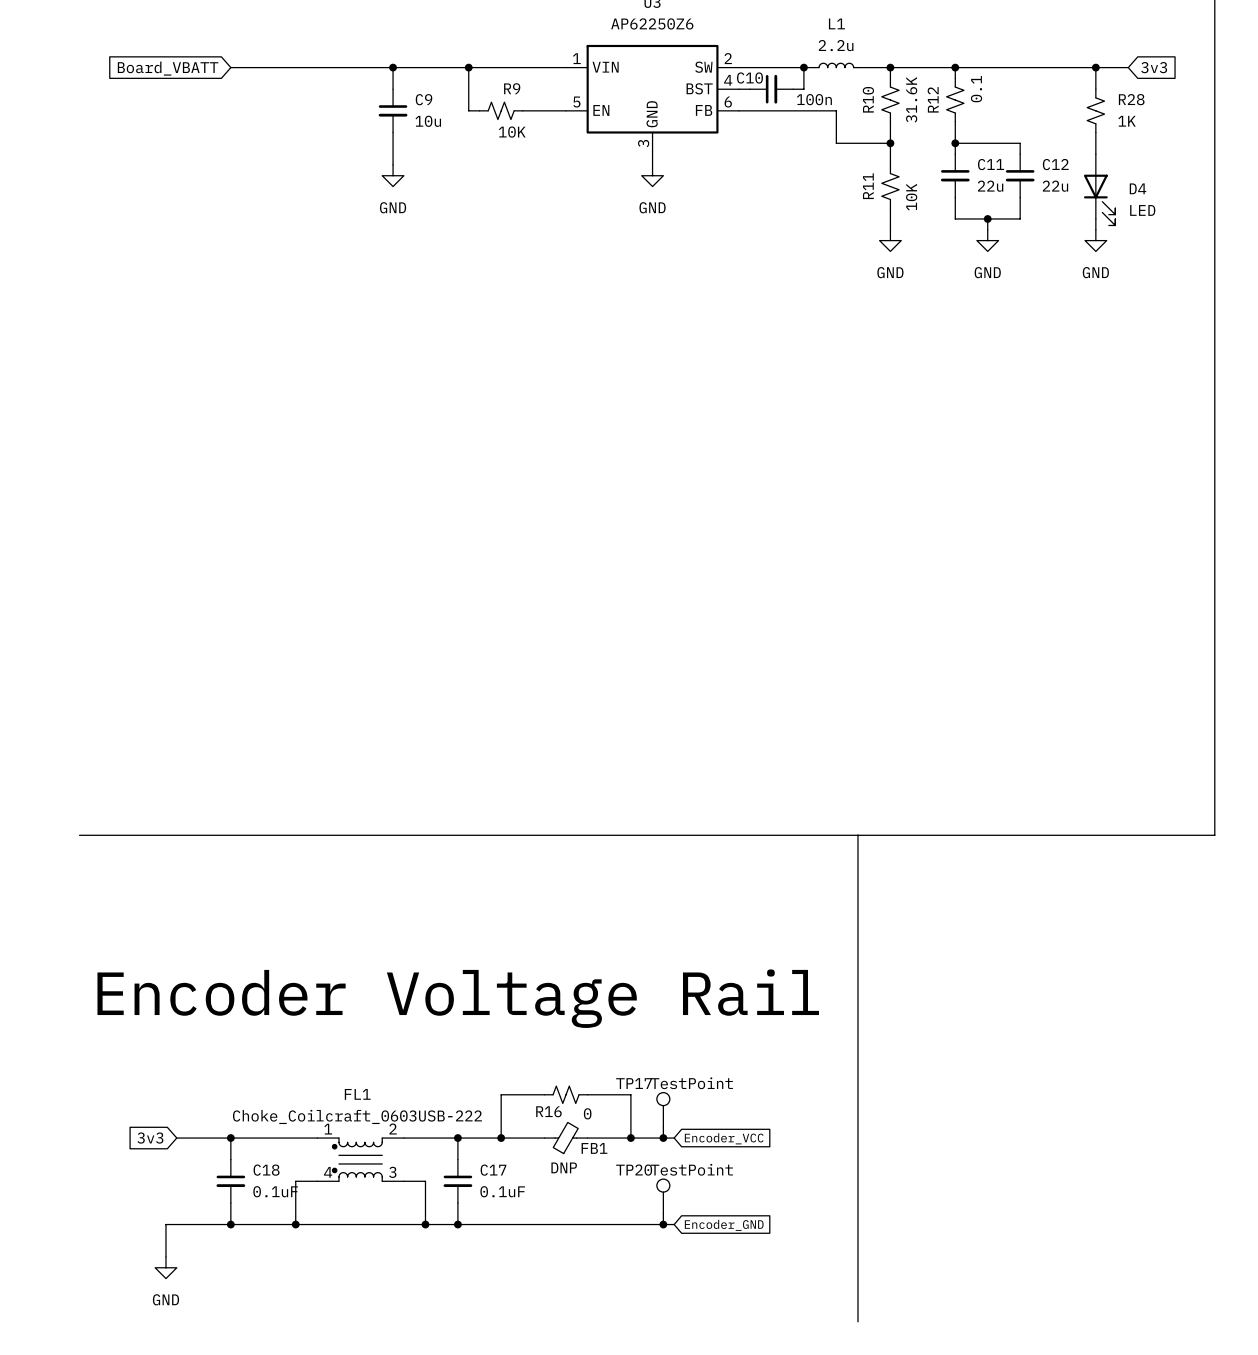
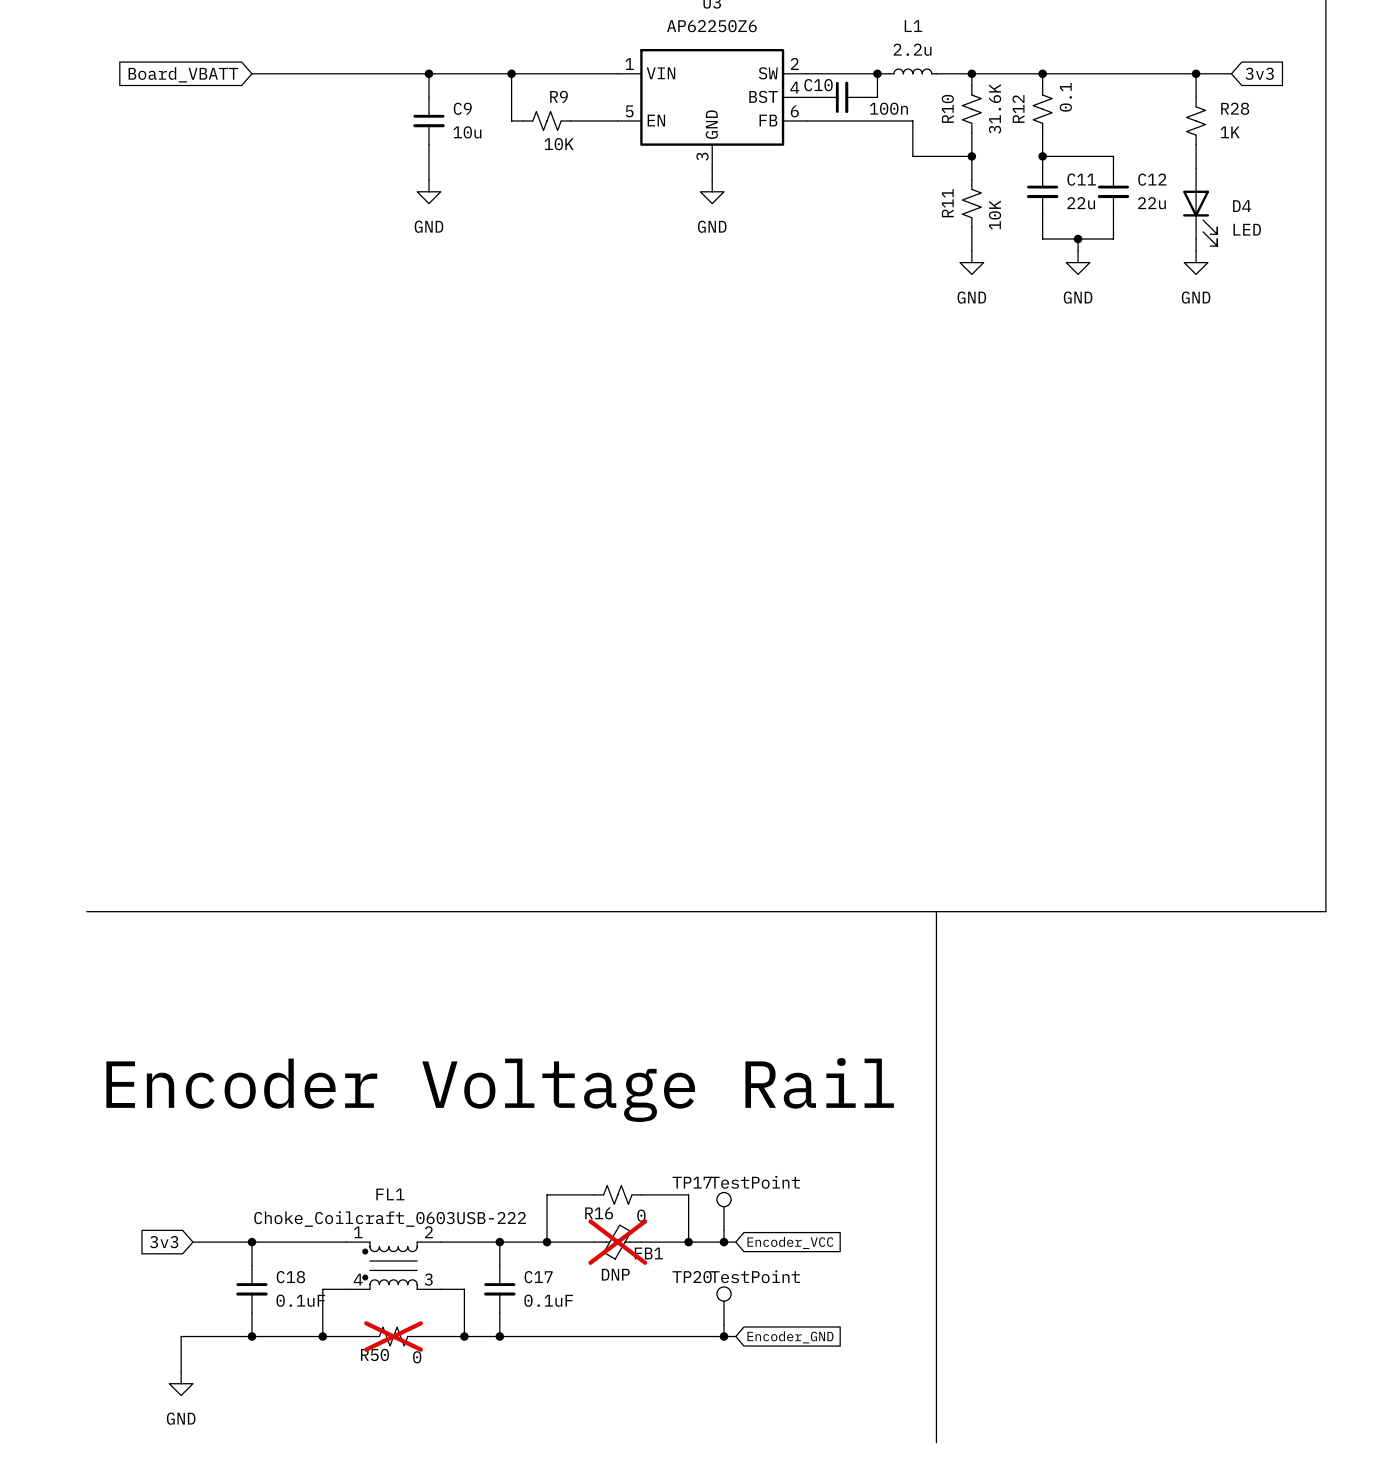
FB1 do-not-place cross: none -> (617, 1242)
R50: none -> 0 (393, 1336)

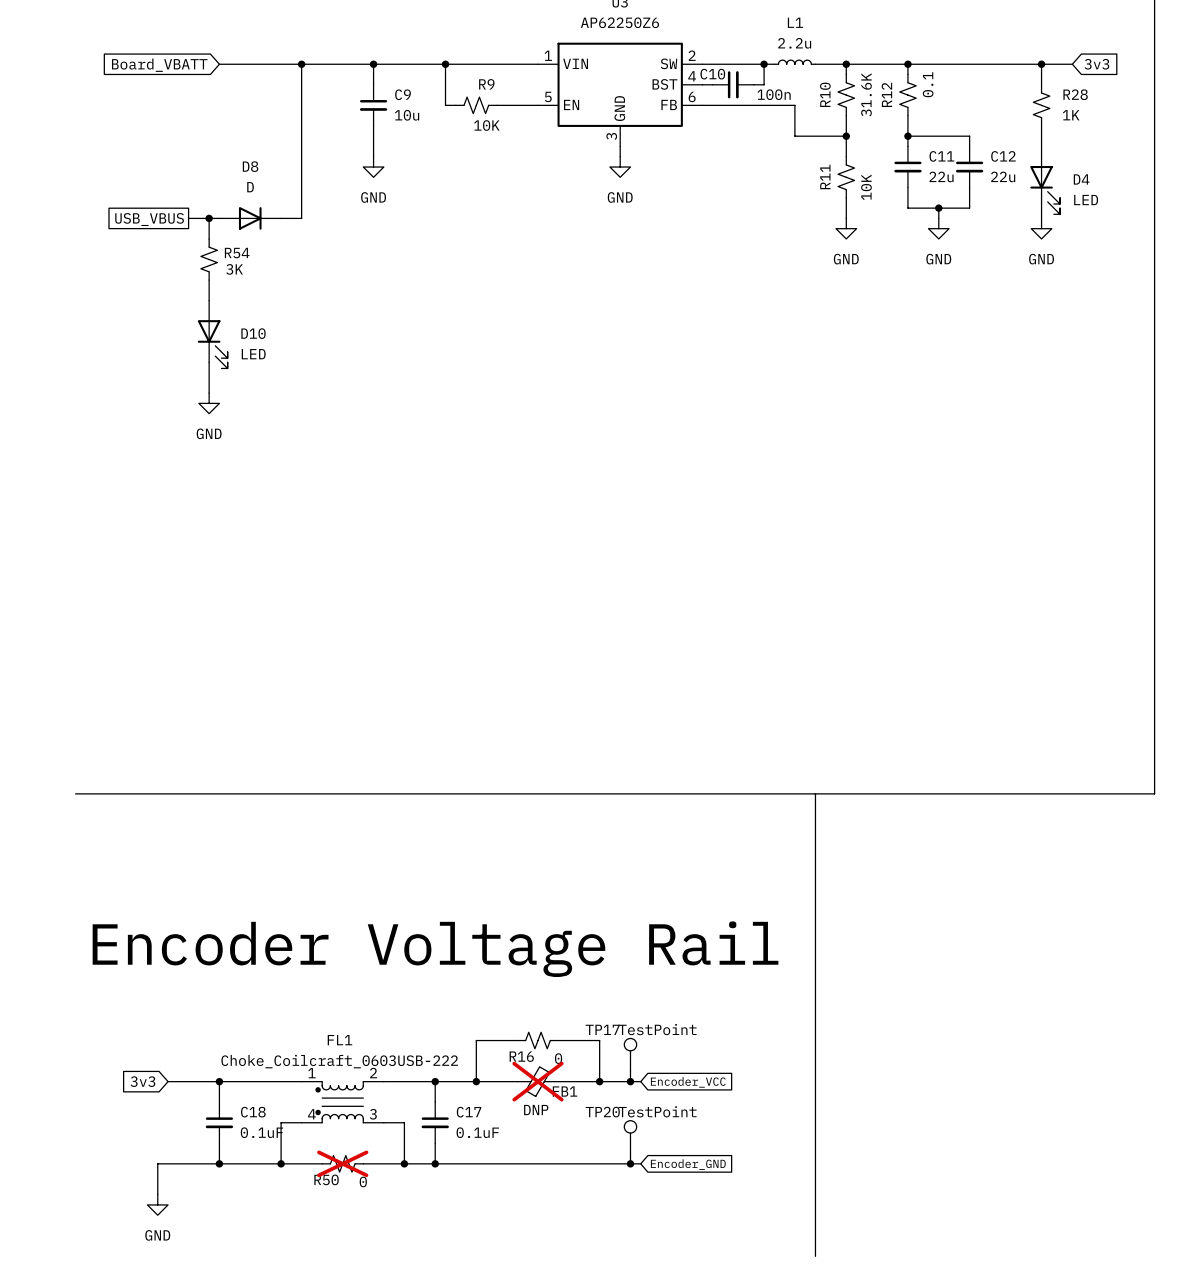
wire: none -> (301, 64) (301, 218) (281, 218)
junction: none -> (301, 64)
wire: none -> (188, 218) (219, 218)
wire: none -> (209, 218) (209, 238)
junction: none -> (209, 218)
D8: none -> D (250, 218)
global label: none -> USB_VBUS (149, 219)
R54: none -> 3K (209, 259)
wire: none -> (209, 280) (209, 300)
D10: none -> LED (212, 334)
wire: none -> (209, 362) (209, 393)
power symbol: none -> GND (209, 403)

